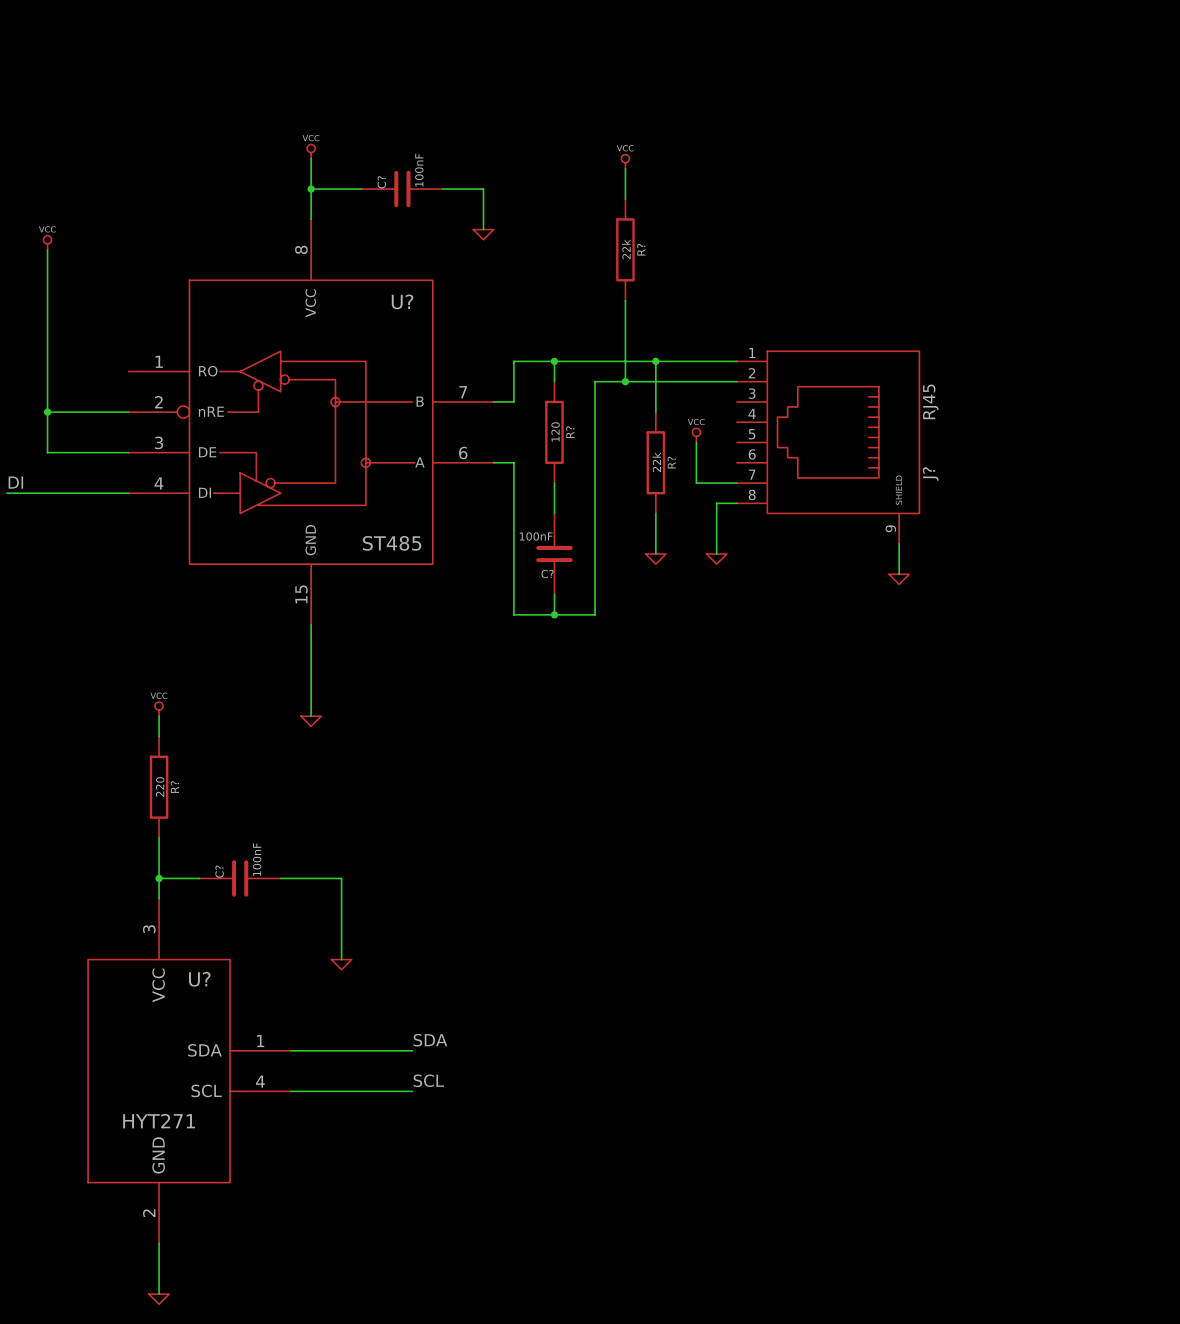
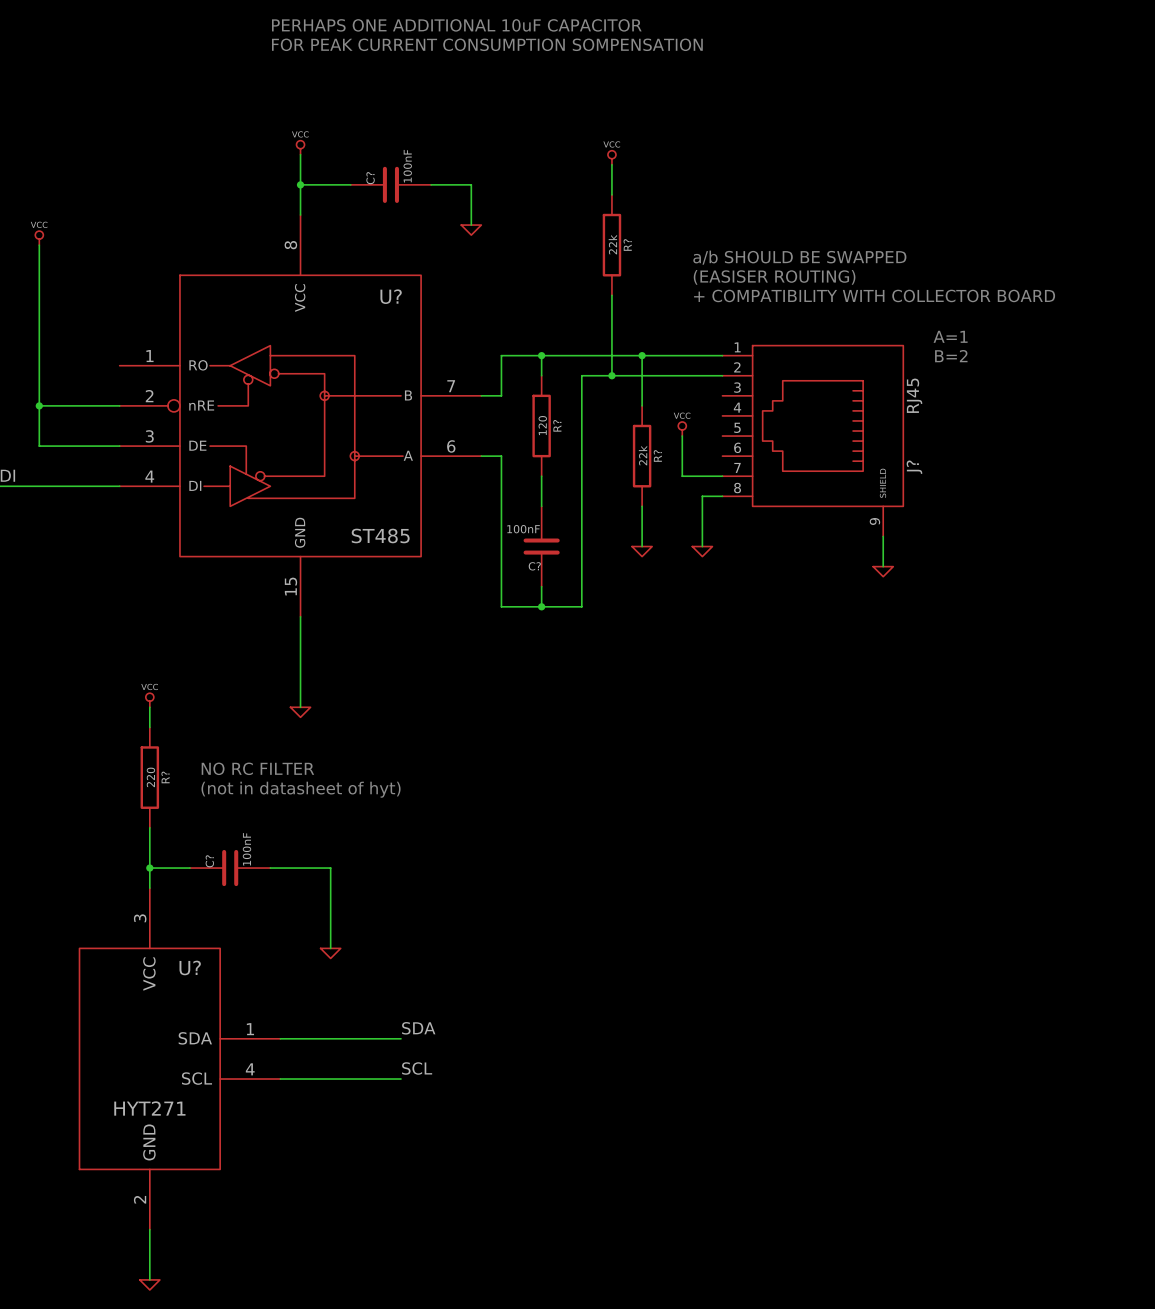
text: none -> PERHAPS ONE ADDITIONAL 10uF CAPACITOR (456, 25)
text: none -> FOR PEAK CURRENT CONSUMPTION SOMPENSATION (487, 44)
text: none -> a/b SHOULD BE SWAPPED (799, 257)
text: none -> (EASISER ROUTING) (774, 277)
text: none -> + COMPATIBILITY WITH COLLECTOR BOARD (874, 295)
text: none -> A=1 (950, 336)
text: none -> B=2 (951, 356)
text: none -> NO RC FILTER (257, 768)
text: none -> (not in datasheet of hyt) (301, 789)

